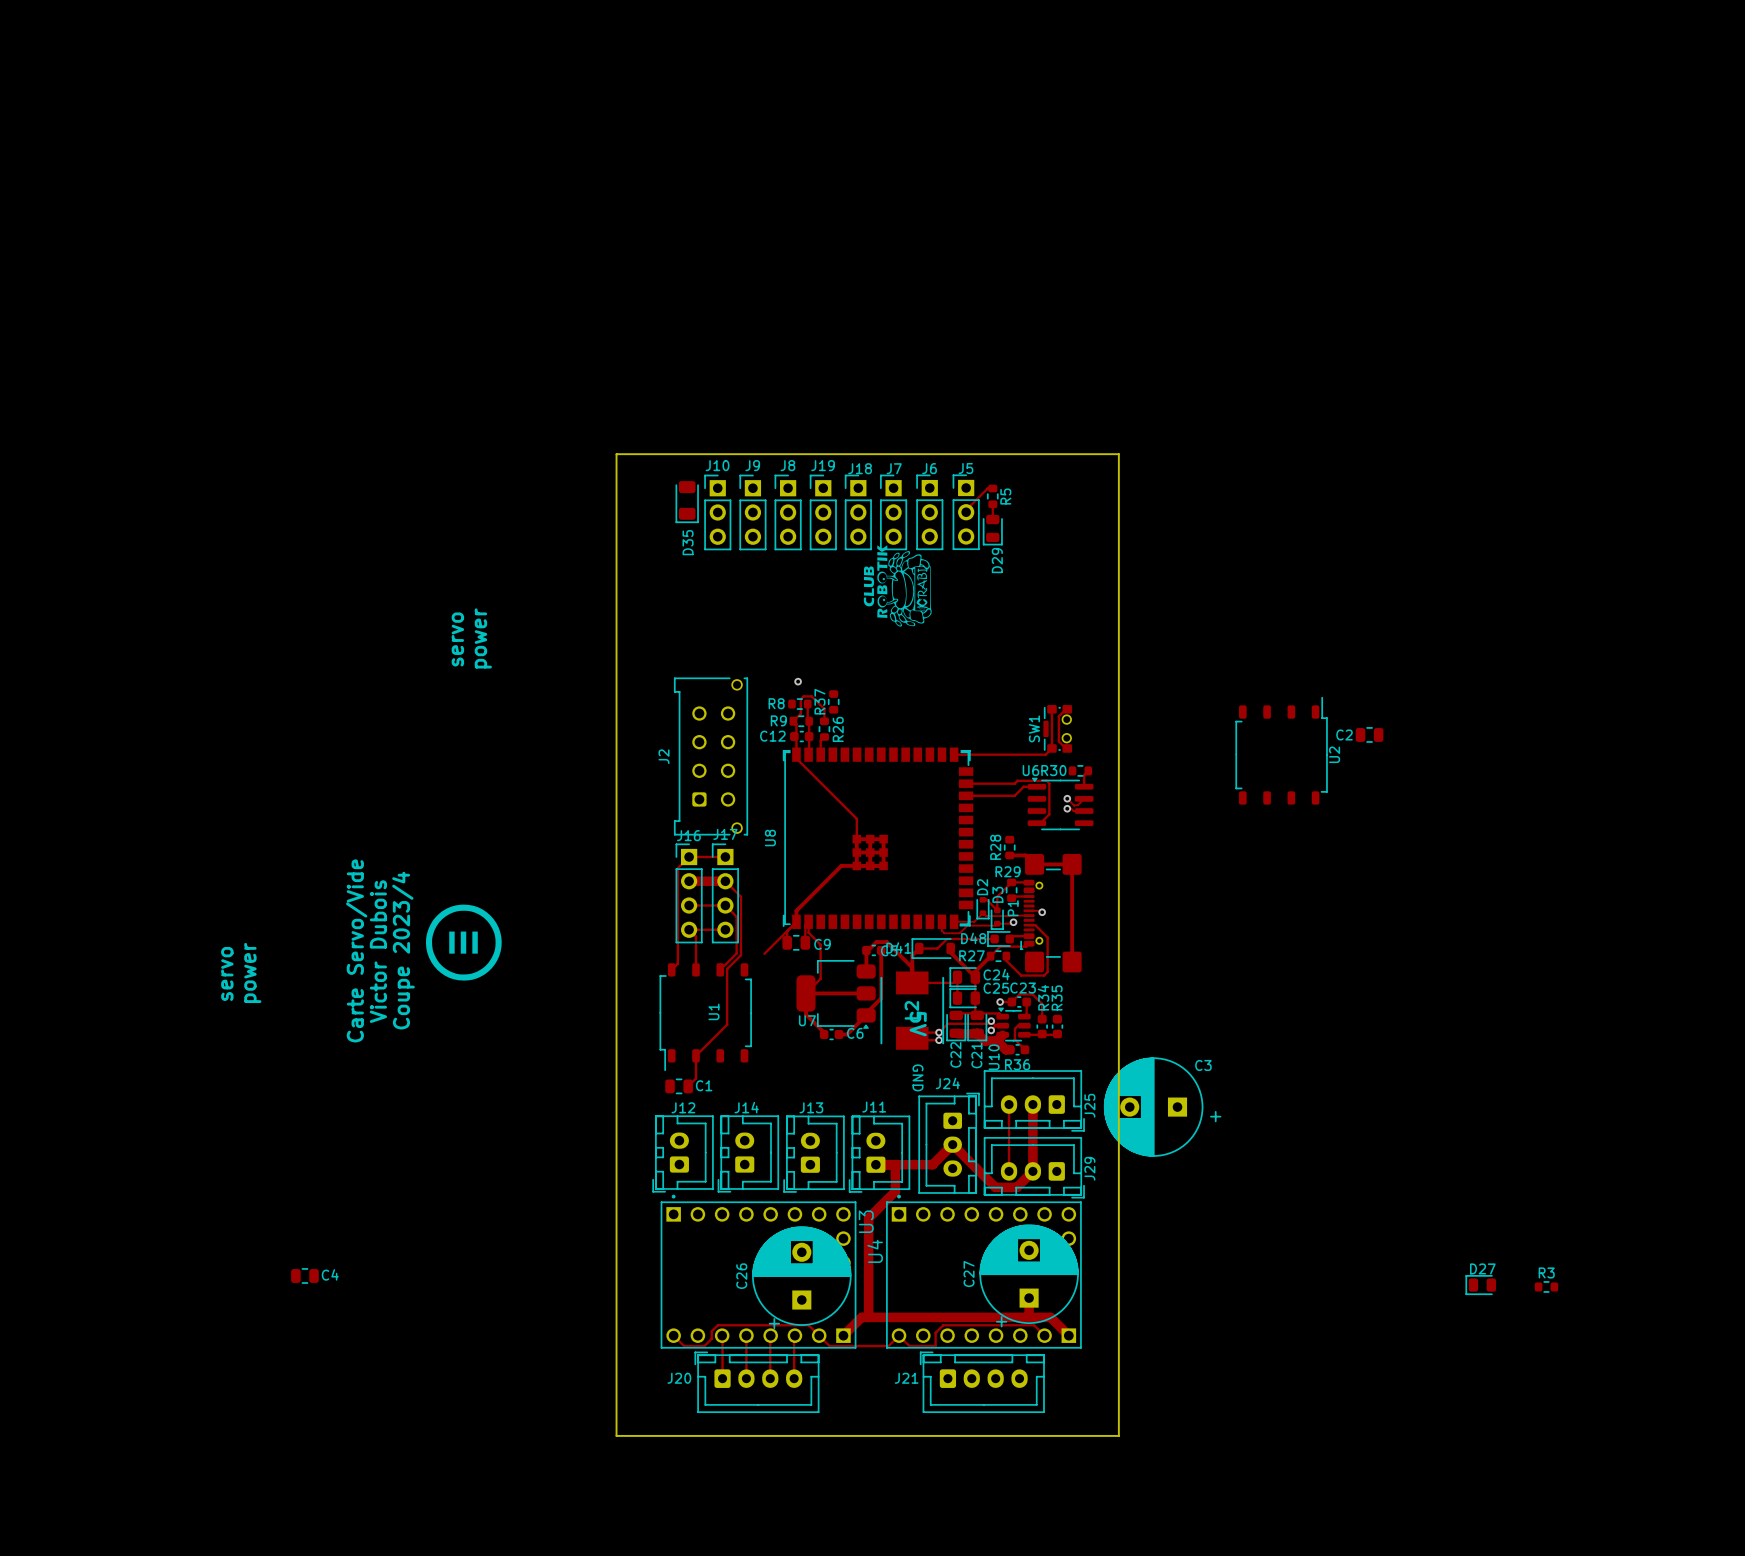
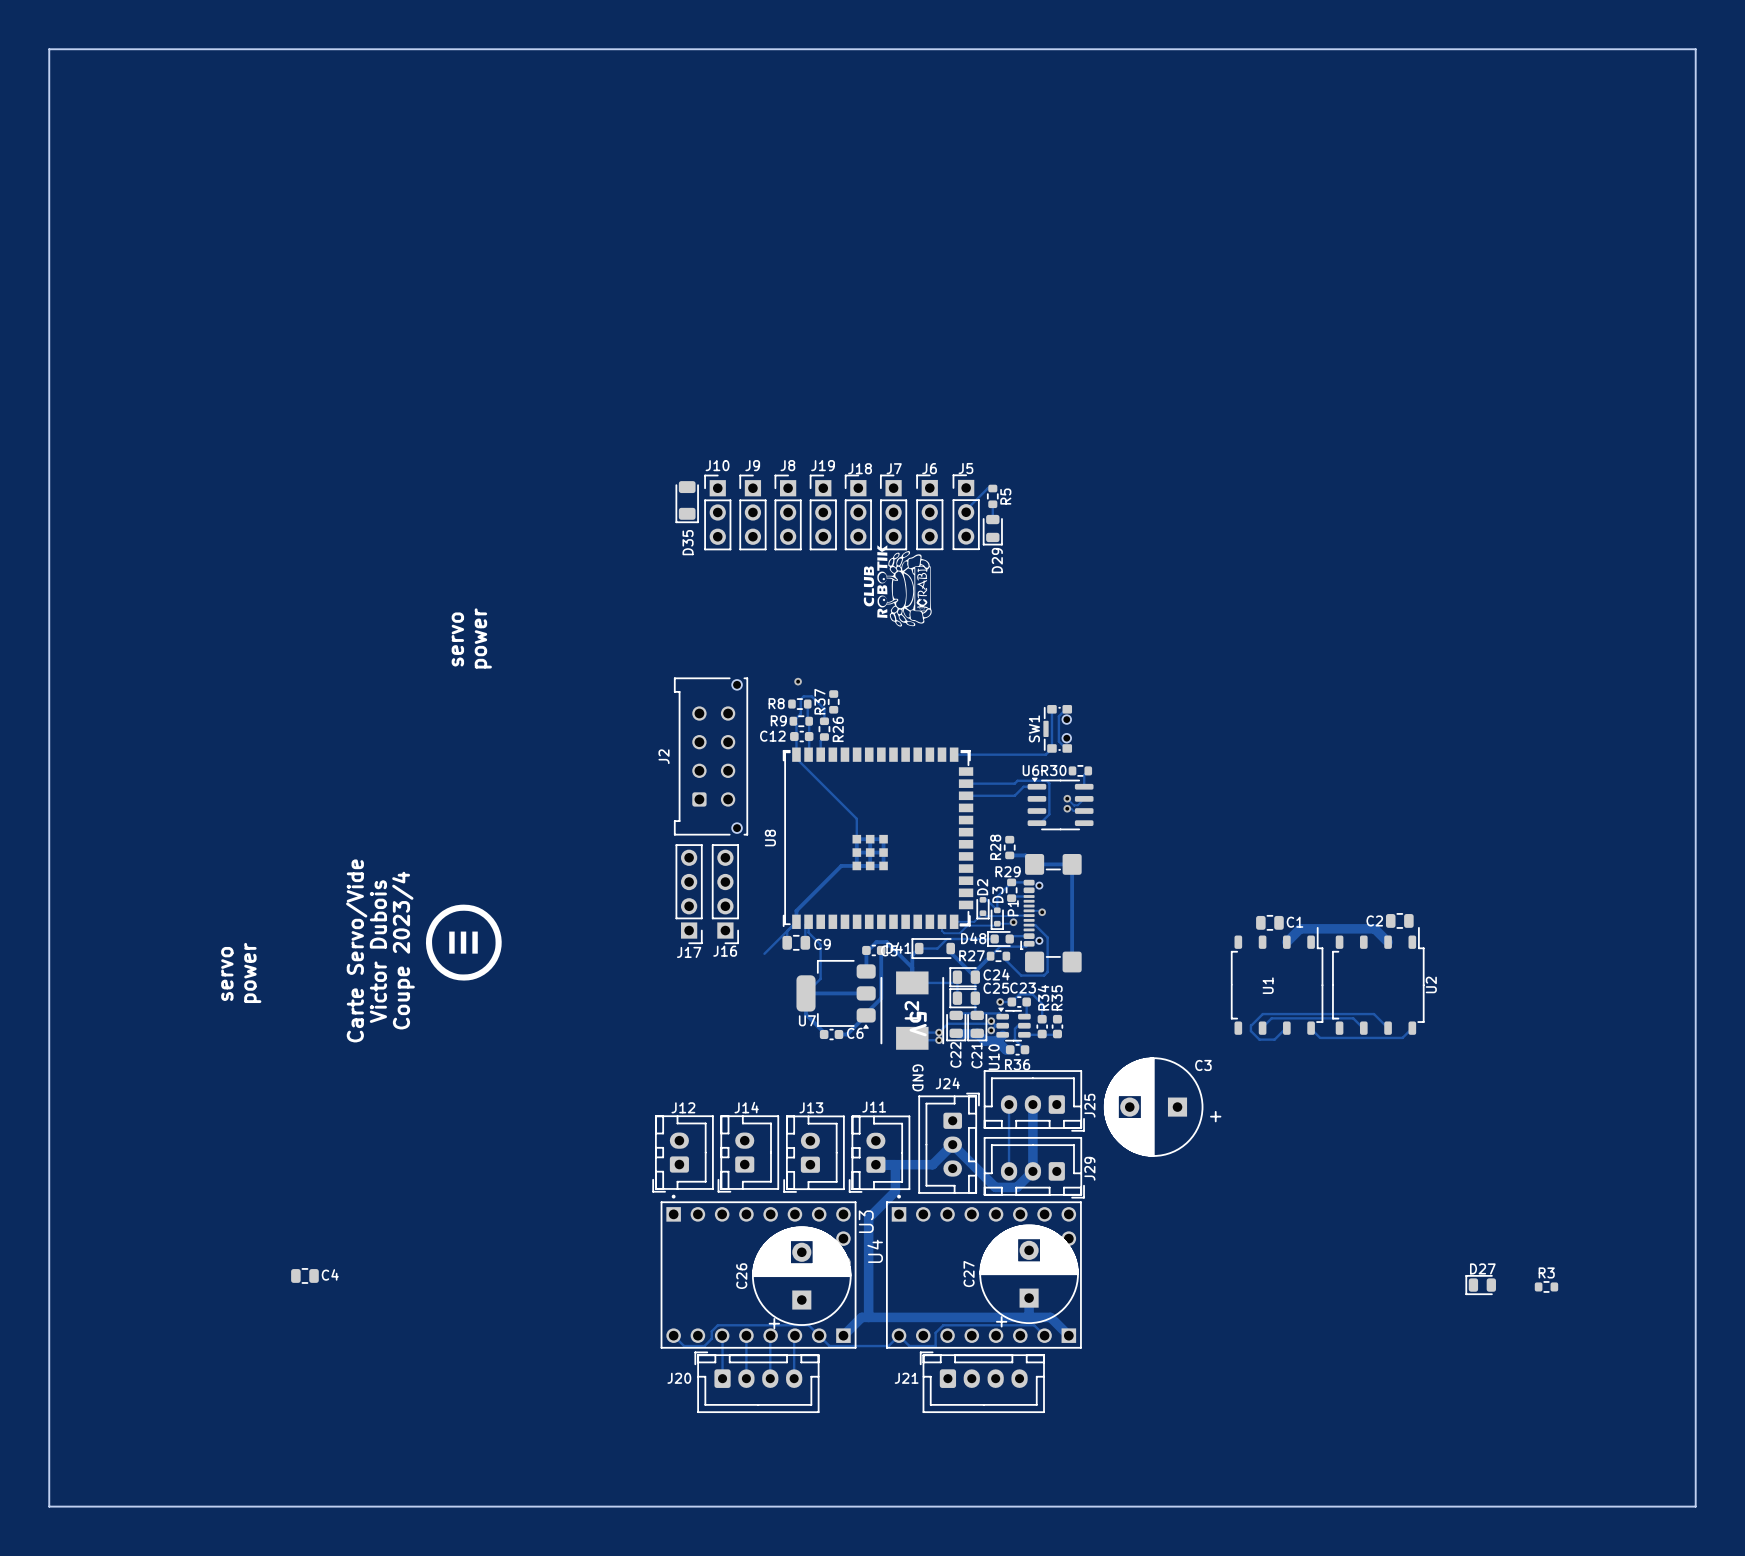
board edge: none -> (49, 49) (1695, 49) (1695, 1506) (49, 1506) (49, 49)
board edge: (616, 454) (1118, 454) (1118, 1435) (616, 1435) (616, 454) -> none
C2 position: (1369, 734) -> (1399, 920)
U2 position: (1281, 750) -> (1378, 981)
track: (725, 857) (689, 857) (677, 868) (677, 963) (671, 969) -> none
track: (689, 881) (725, 881) (740, 896) (740, 955) (727, 969) (727, 1024) (695, 1055) (695, 1078) (688, 1086) -> none
J16 rotation: 0° (689, 893) -> 180° (725, 894)
J17 rotation: 0° (725, 893) -> 180° (689, 894)
track: (689, 905) (725, 905) (736, 916) (736, 953) (720, 969) -> none
track: (725, 929) (689, 929) (695, 936) (695, 969) -> none
track: none -> (1286, 942) (1300, 928) (1374, 928) (1388, 942)
U1 rotation: 0° (705, 1016) -> 180° (1277, 981)
U1 position: (705, 1016) -> (1277, 981)
track: none -> (1250, 1025) (1250, 1031) (1259, 1039) (1274, 1039) (1286, 1028)
track: none -> (1251, 1025) (1262, 1014) (1373, 1014) (1388, 1028)
track: none -> (1261, 1028) (1271, 1018) (1353, 1018) (1363, 1028)
track: none -> (1310, 1028) (1320, 1037)
track: none -> (1412, 1028) (1402, 1037) (1320, 1037)
C1 position: (679, 1086) -> (1269, 922)

